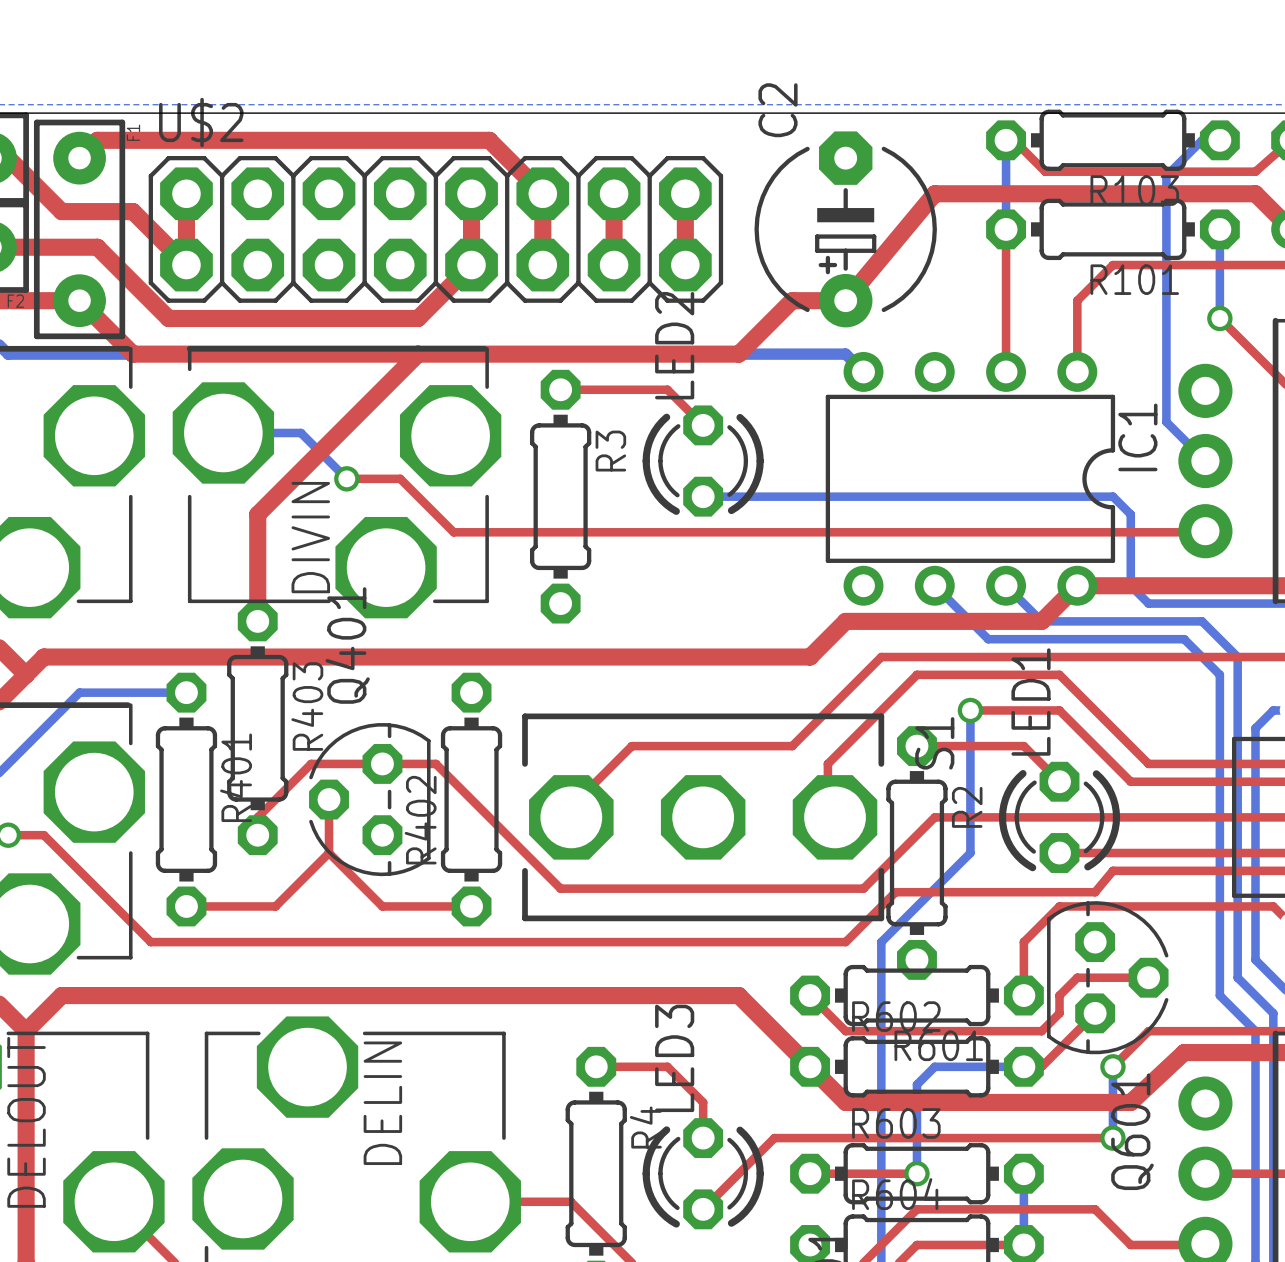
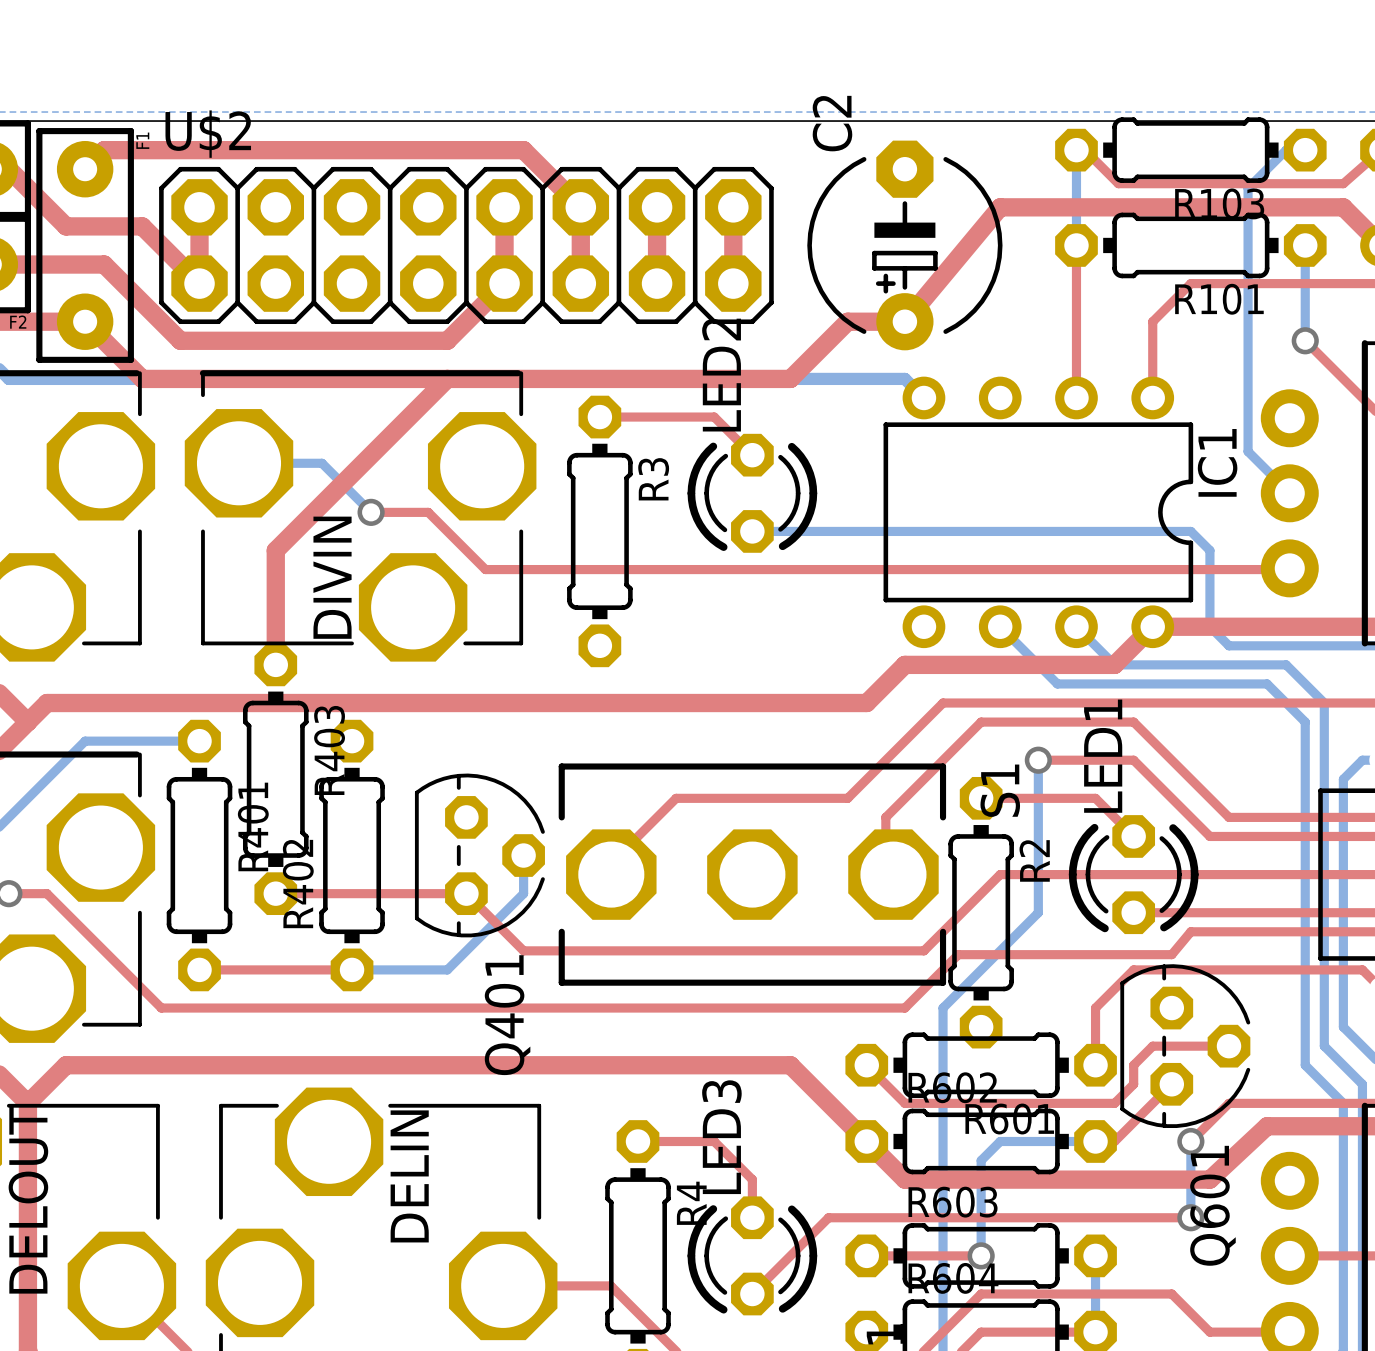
top track: (329, 799) (329, 853) -> none
Q401 rotation: 0° (369, 799) -> 180° (479, 855)
R402 position: (471, 799) -> (352, 855)
bottom track: none -> (523, 855) (523, 893) (447, 969) (352, 969)
top track: (257, 835) (257, 817) (311, 763) (435, 763) (560, 888) -> (275, 893) (466, 893) (523, 950) (599, 950)
top track: (329, 853) (275, 906) -> (352, 969) (294, 969)
top track: (329, 853) (382, 906) (471, 906) -> none

